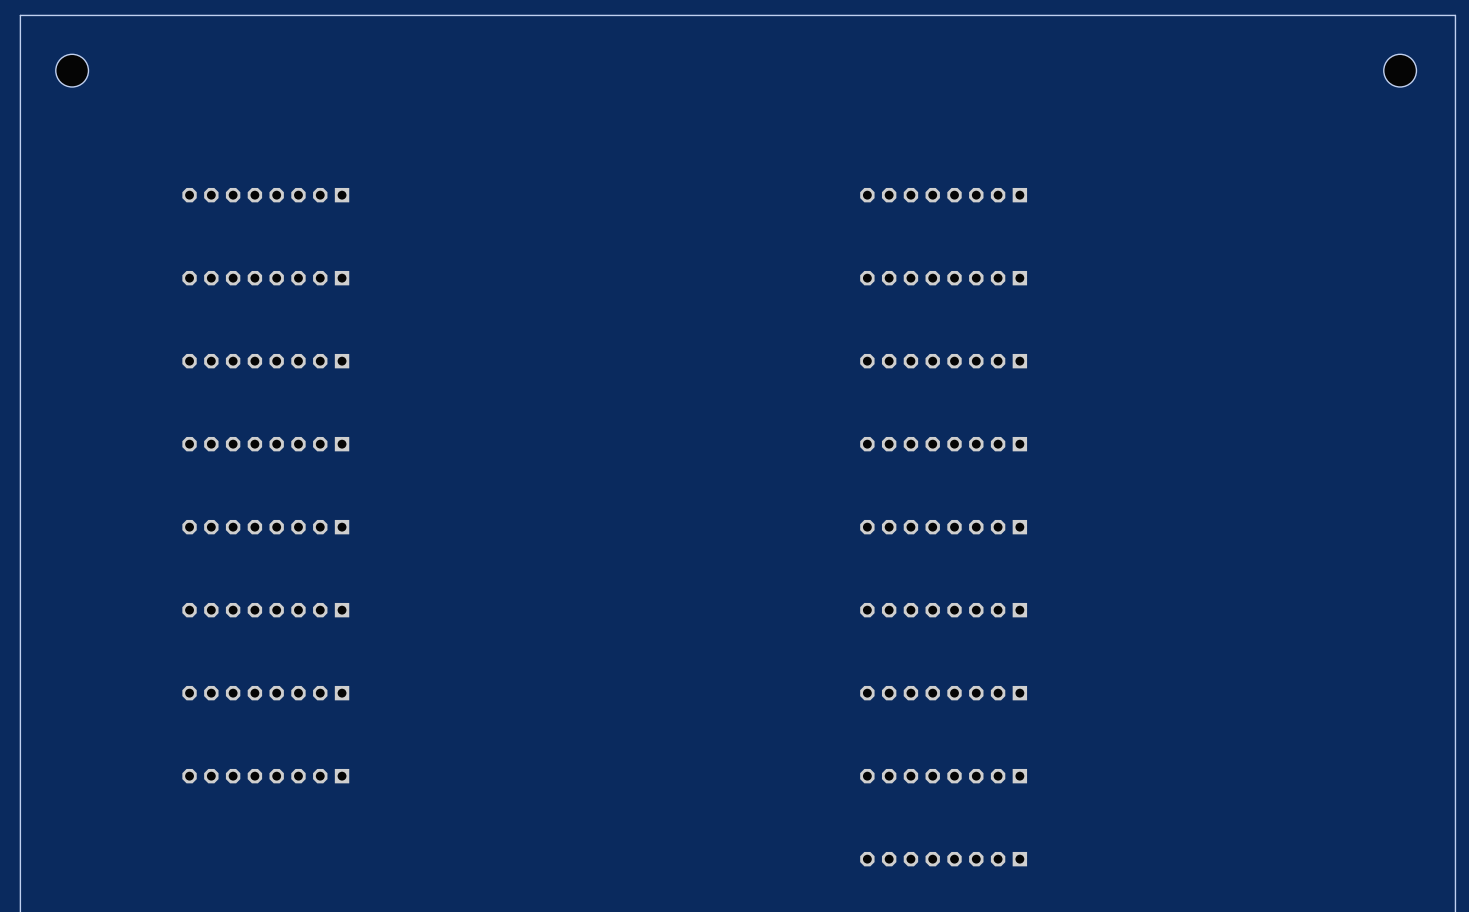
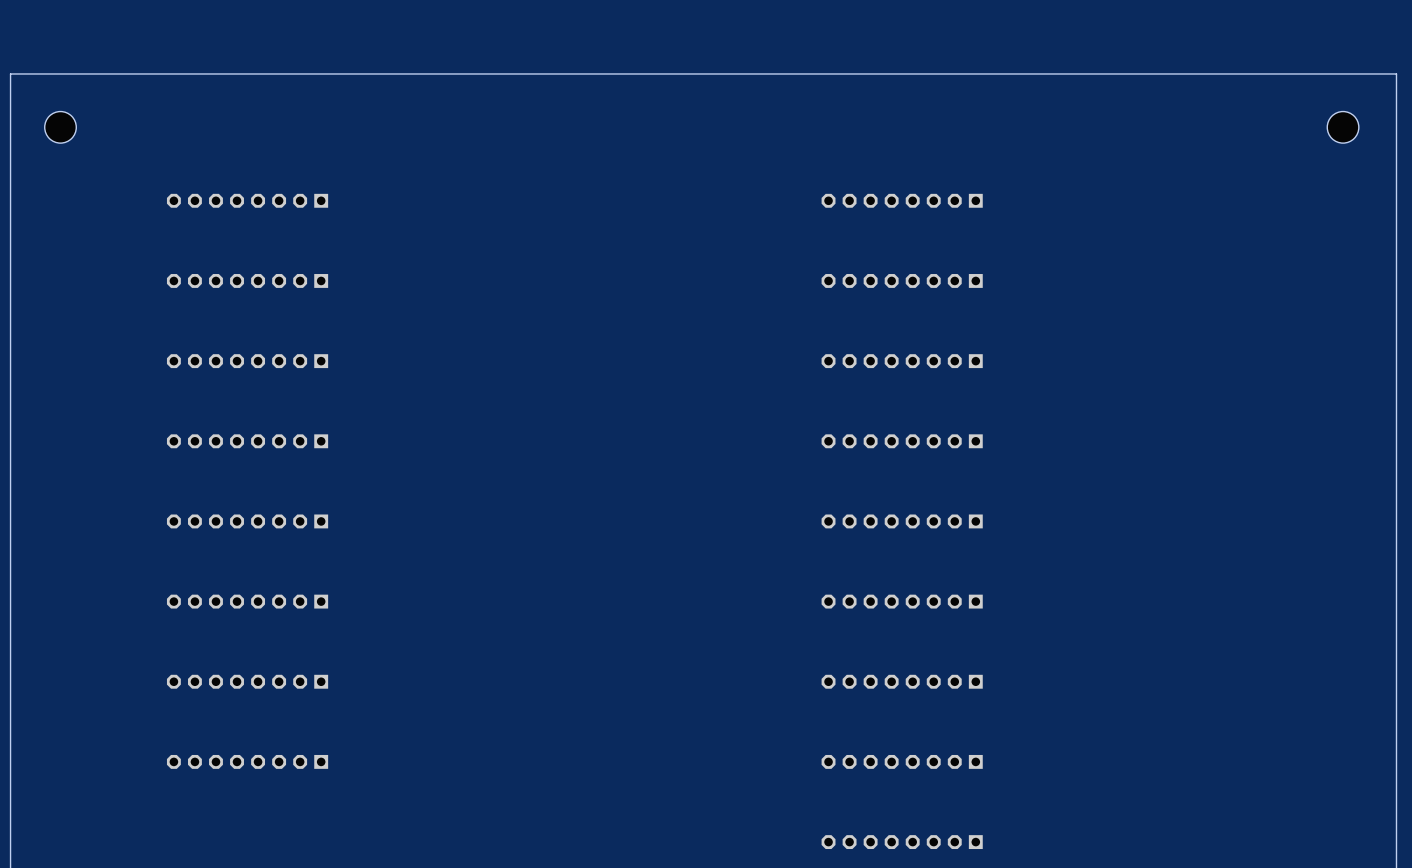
board edge: (1455, 63) (1455, 15) (20, 15) (20, 63) -> (1396, 73) (10, 73)
part position: (72, 70) -> (60, 127)
part position: (1400, 70) -> (1343, 127)

